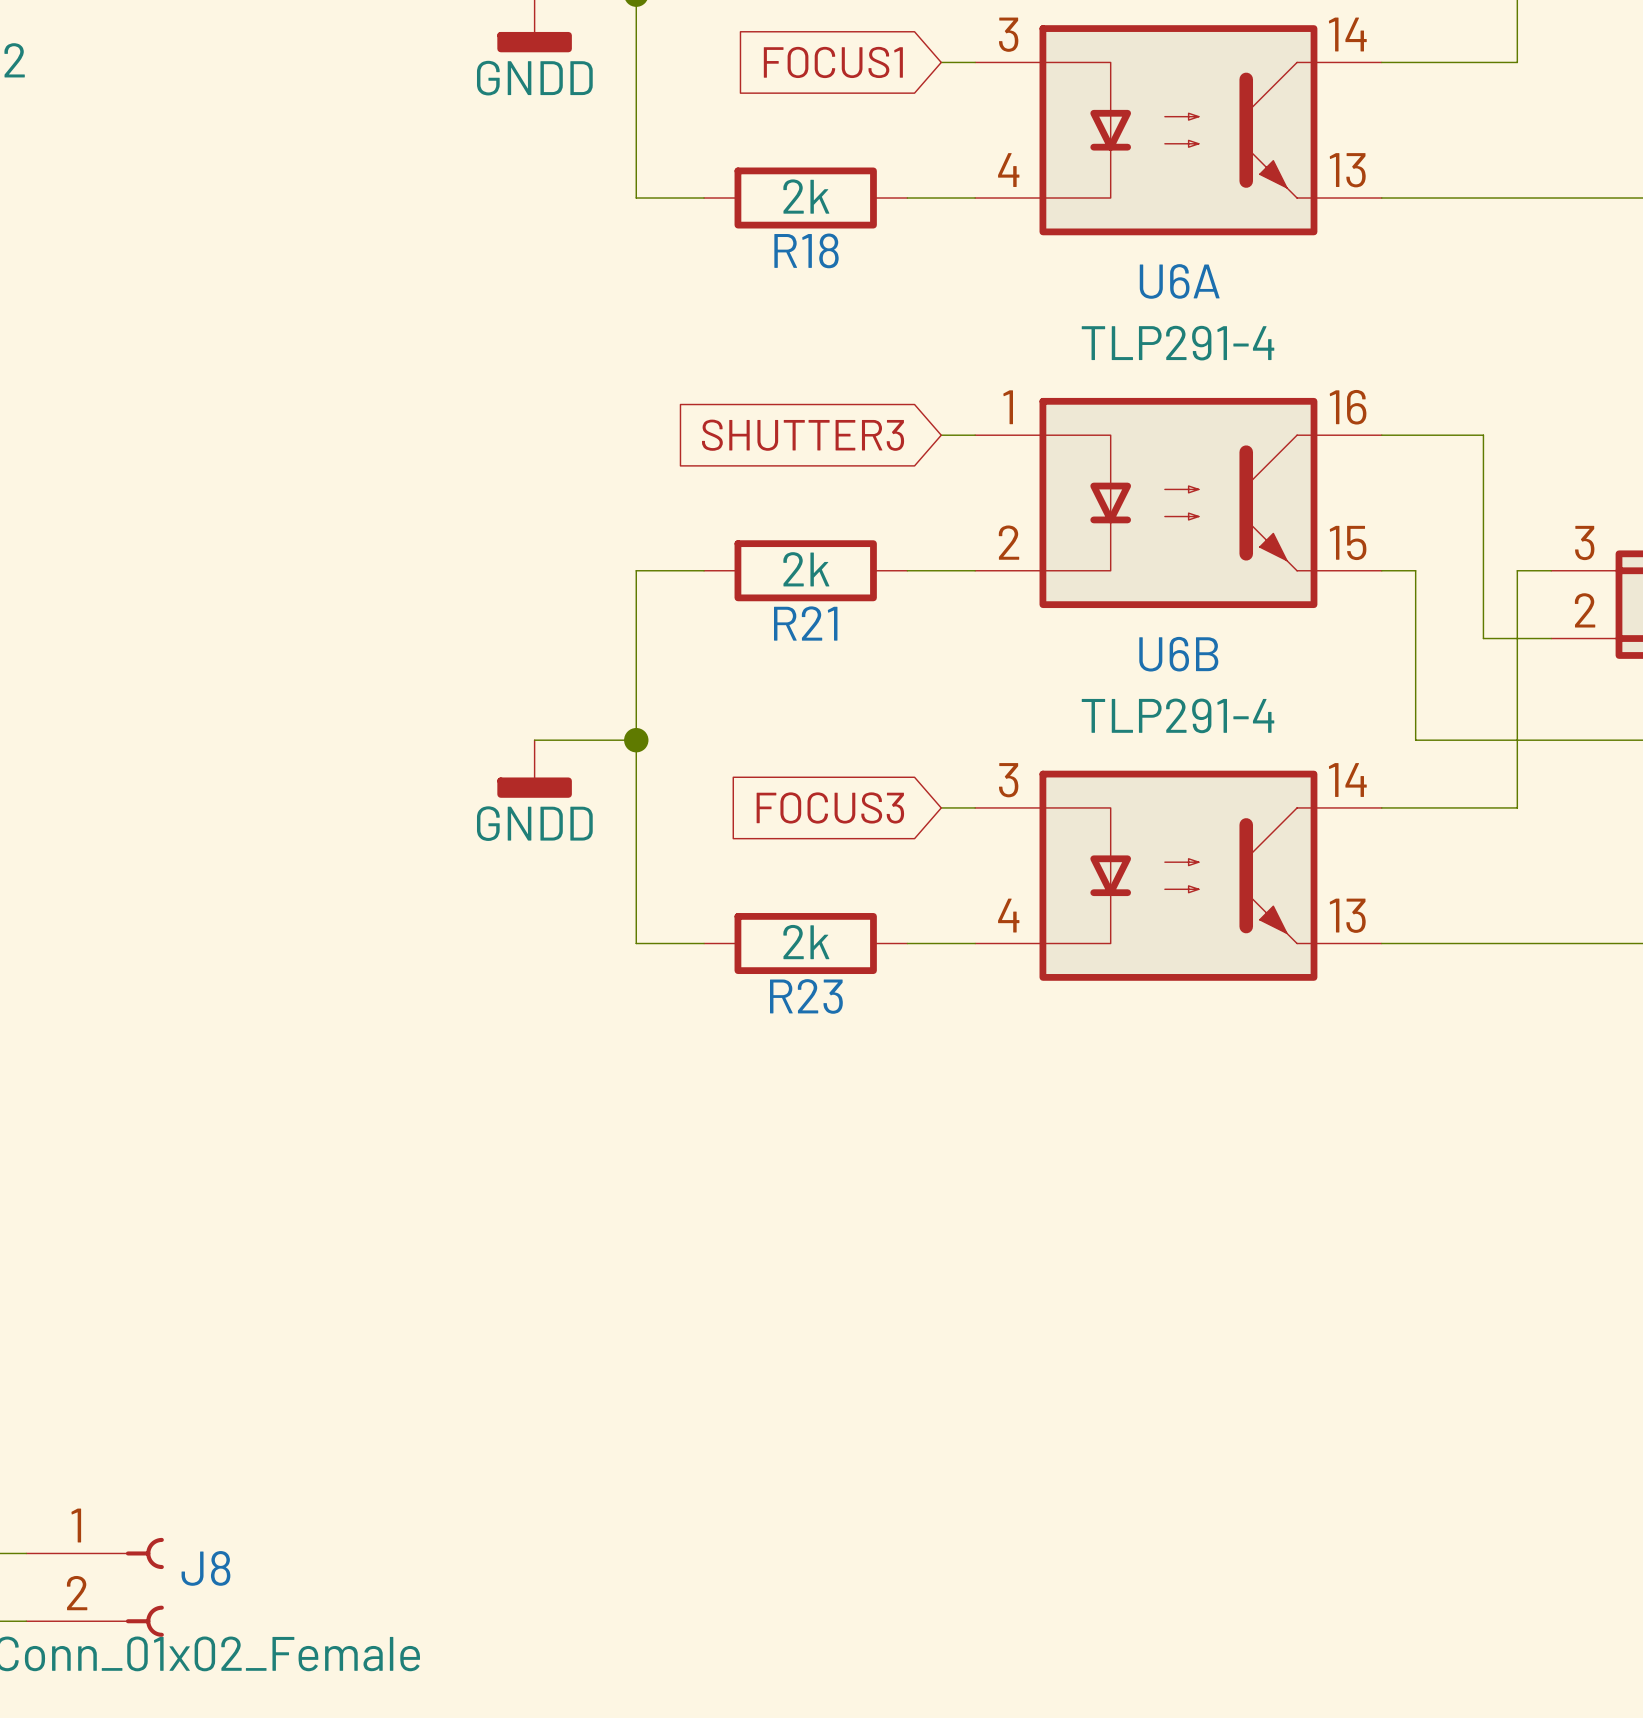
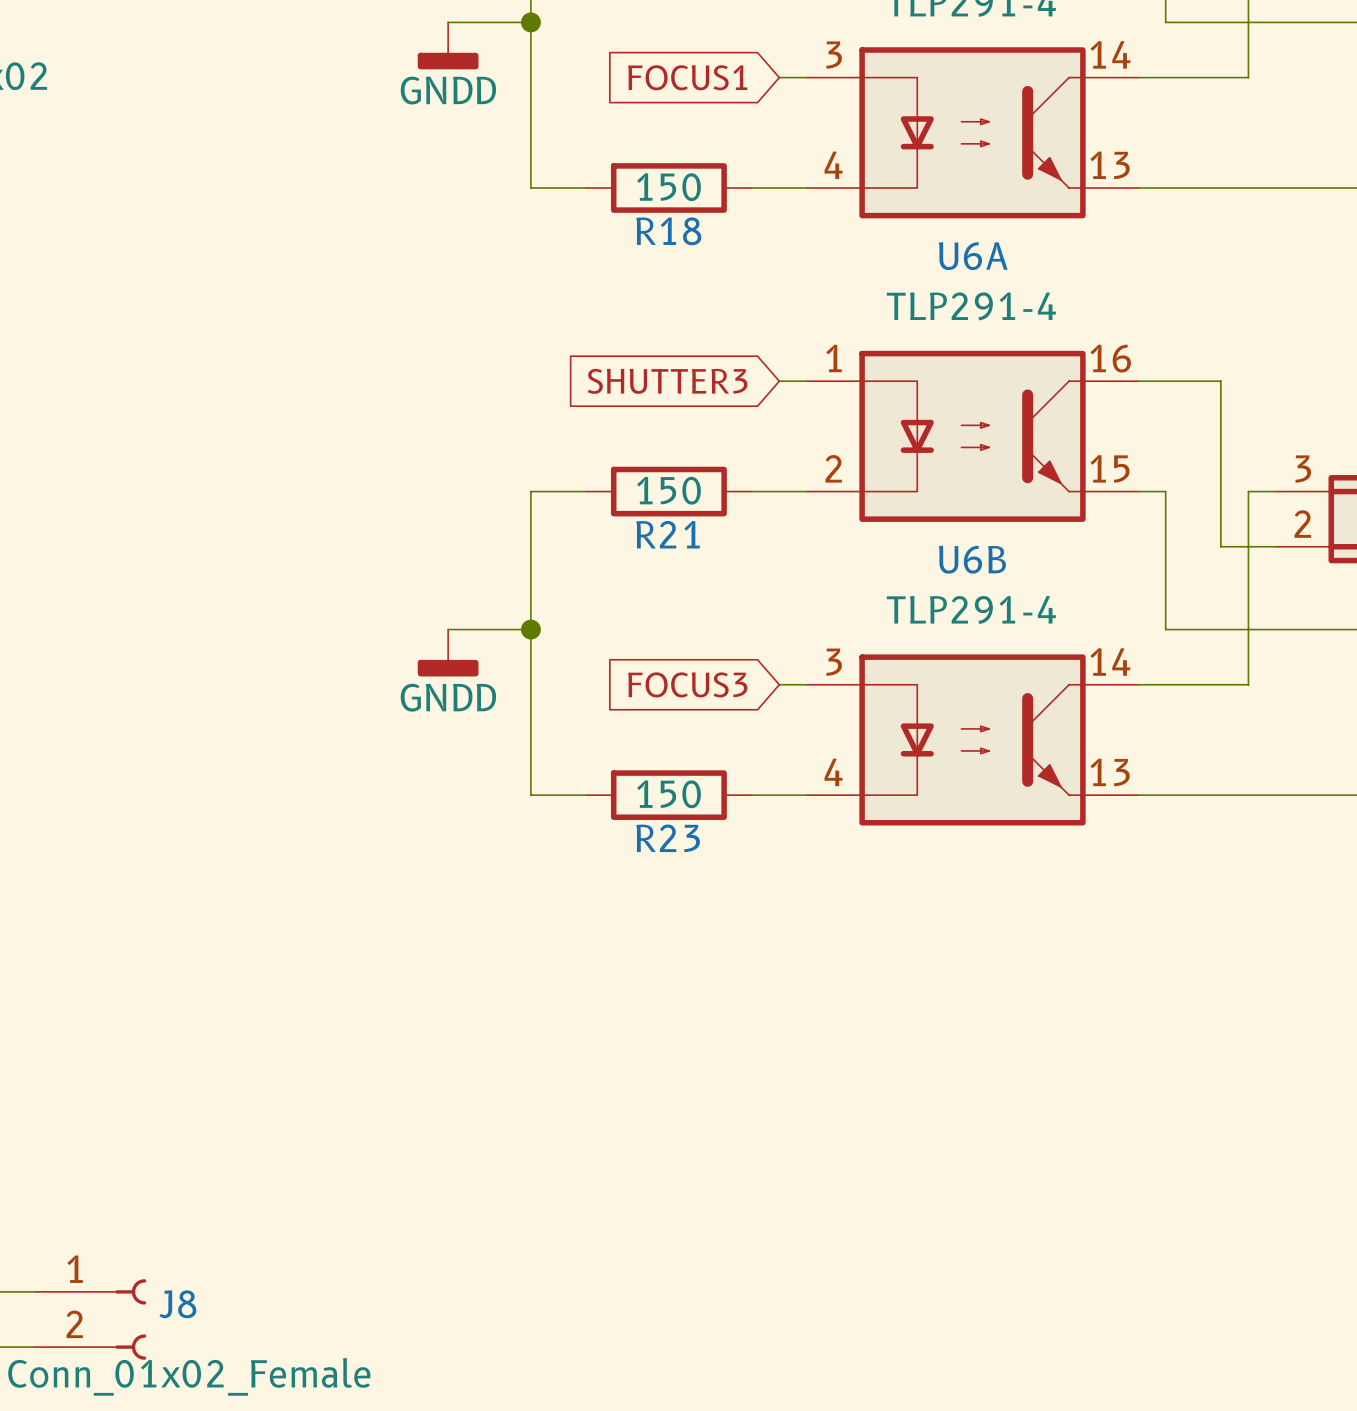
R18 value: 2k (806, 196) -> 150 (668, 187)
R21 value: 2k (806, 569) -> 150 (668, 490)
R23 value: 2k (806, 942) -> 150 (668, 794)

